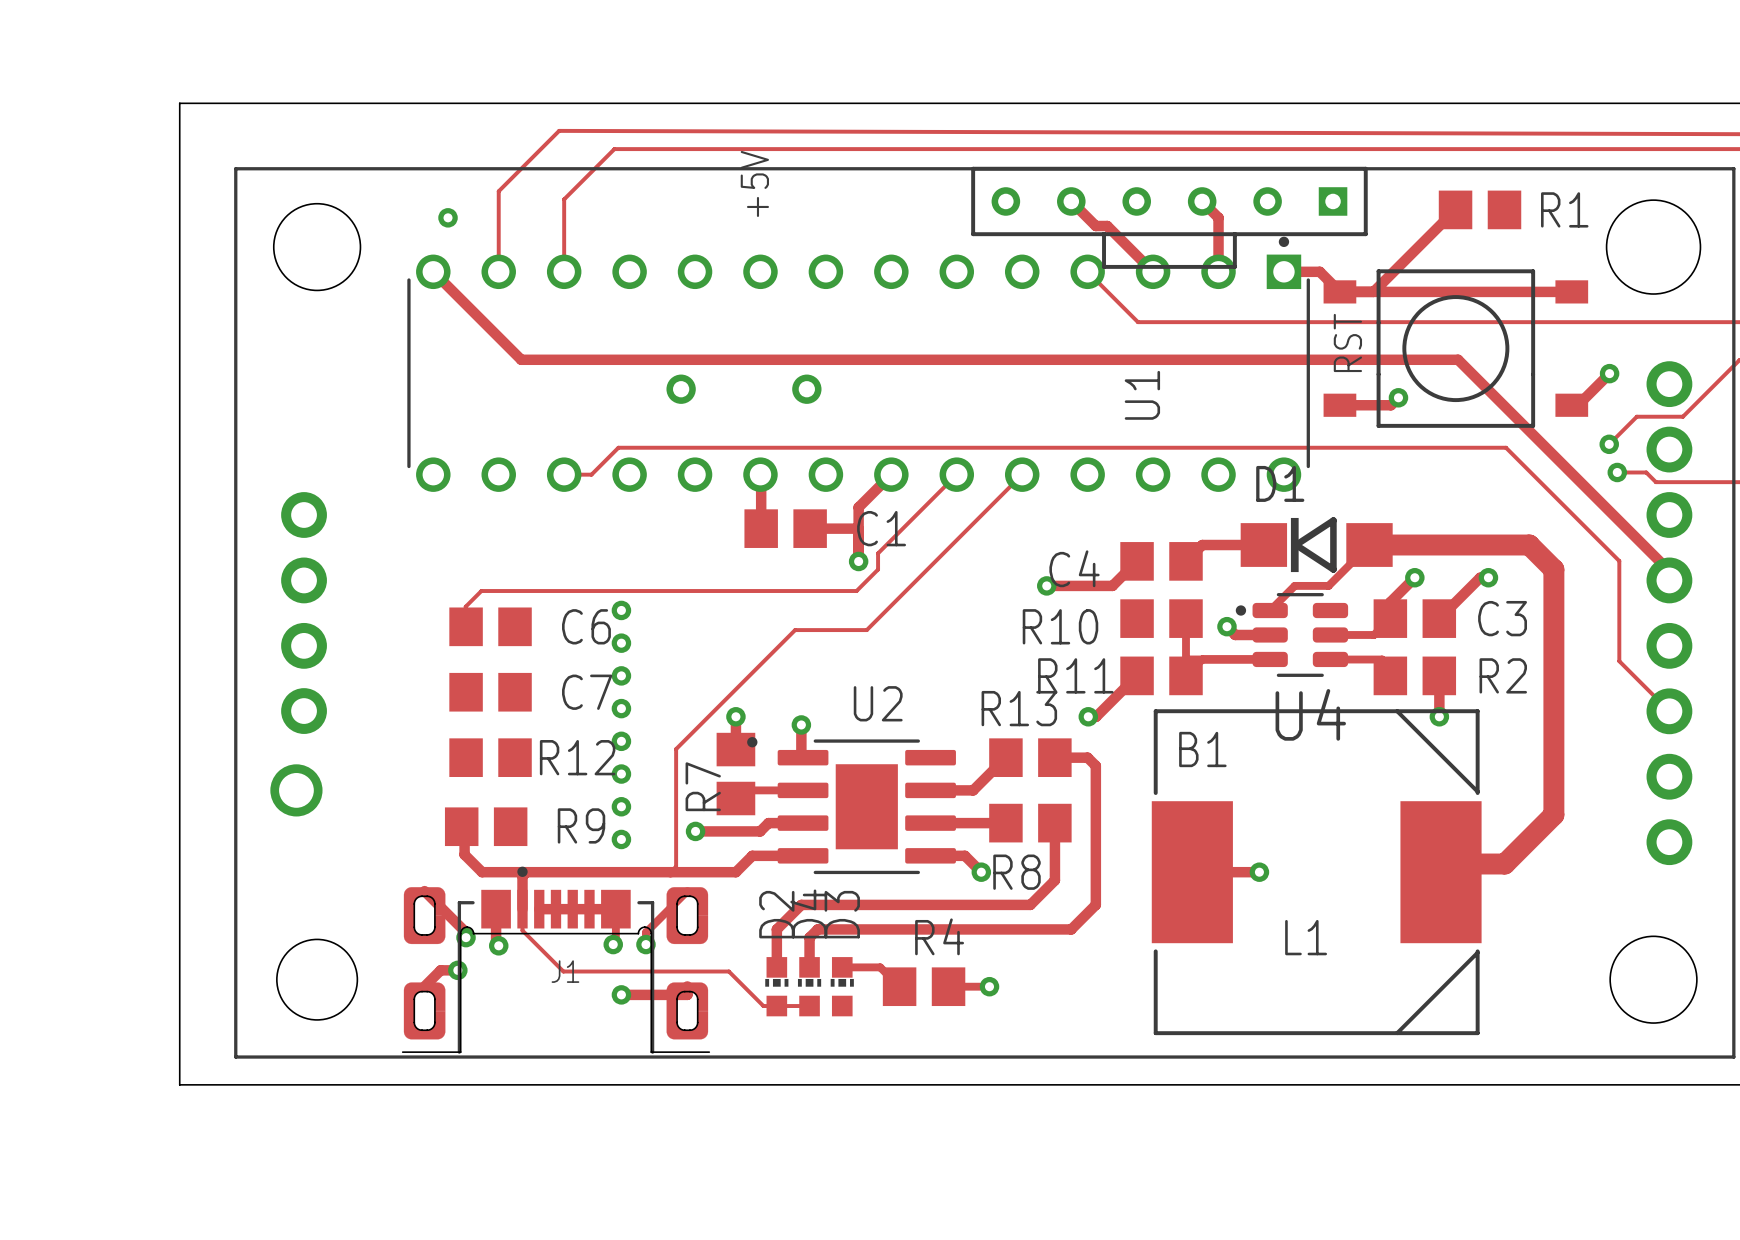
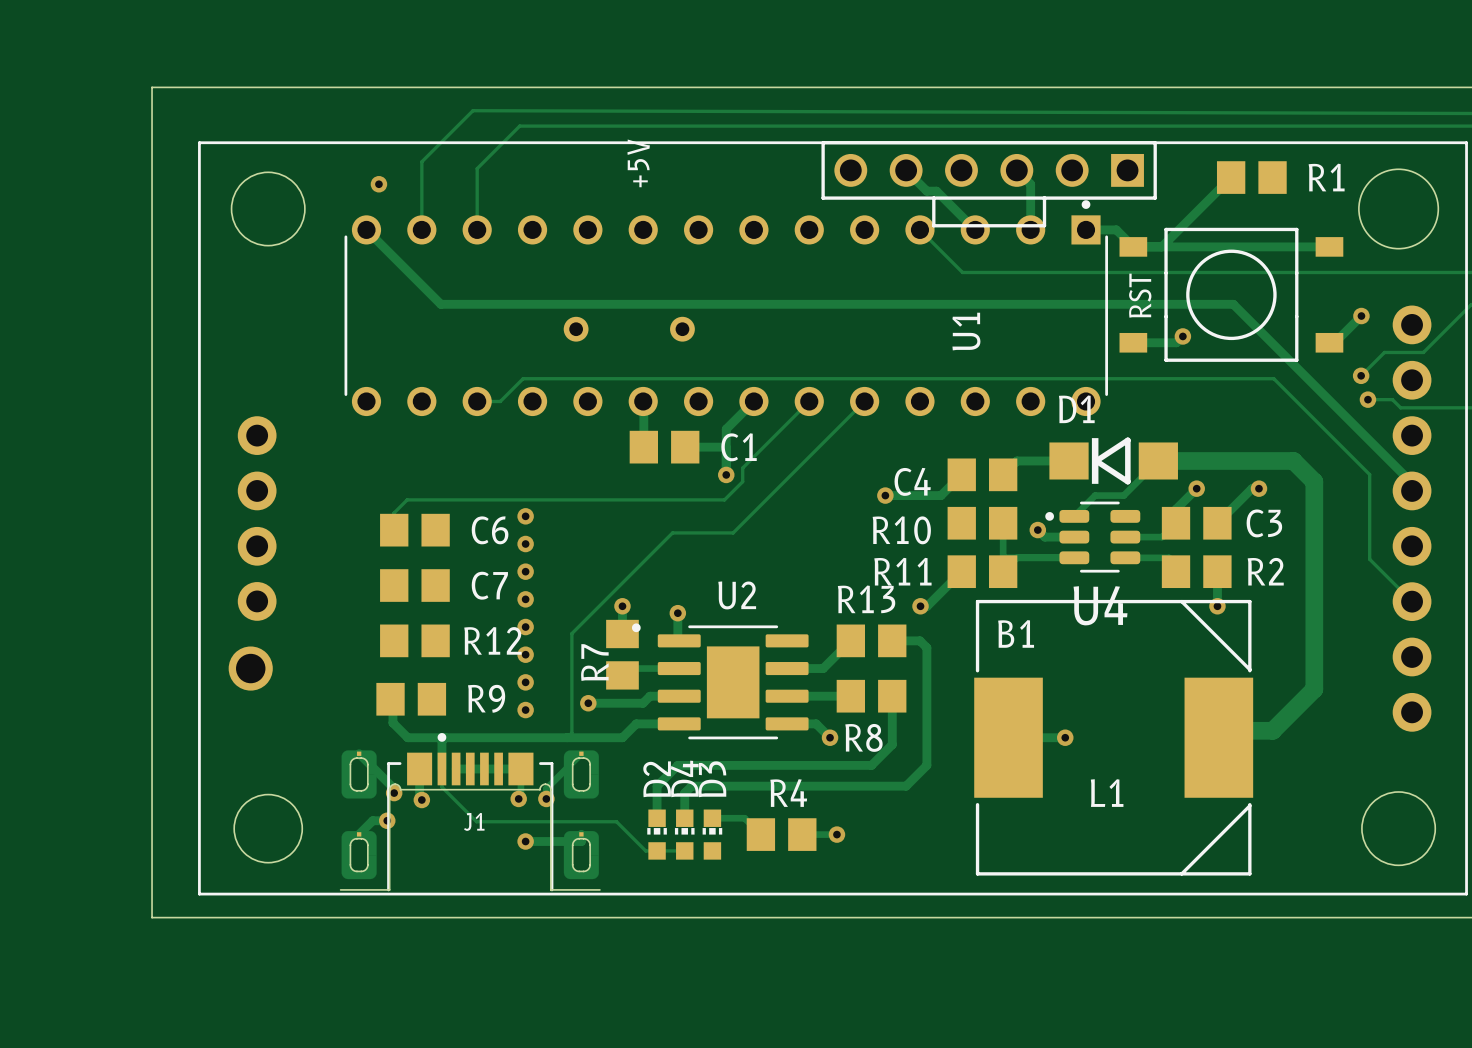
part footprint: [971, 166, 1368, 269] -> [821, 141, 1157, 228]

